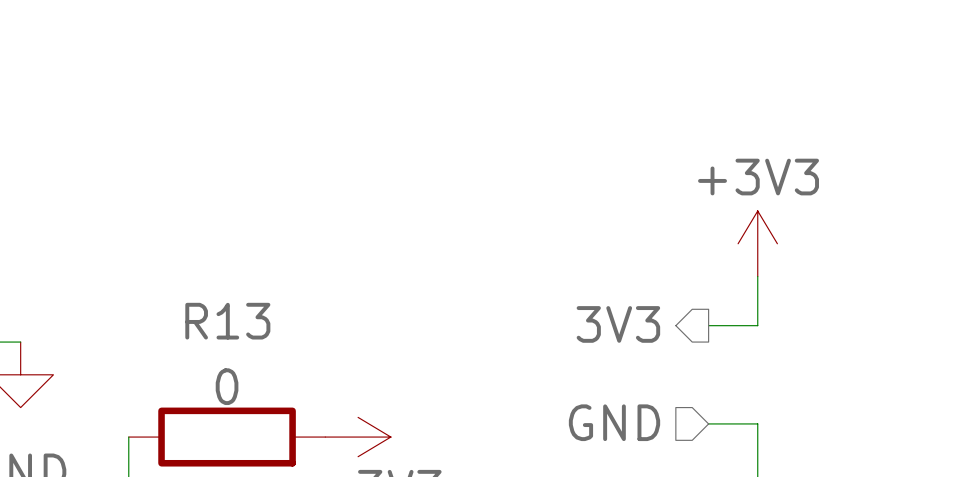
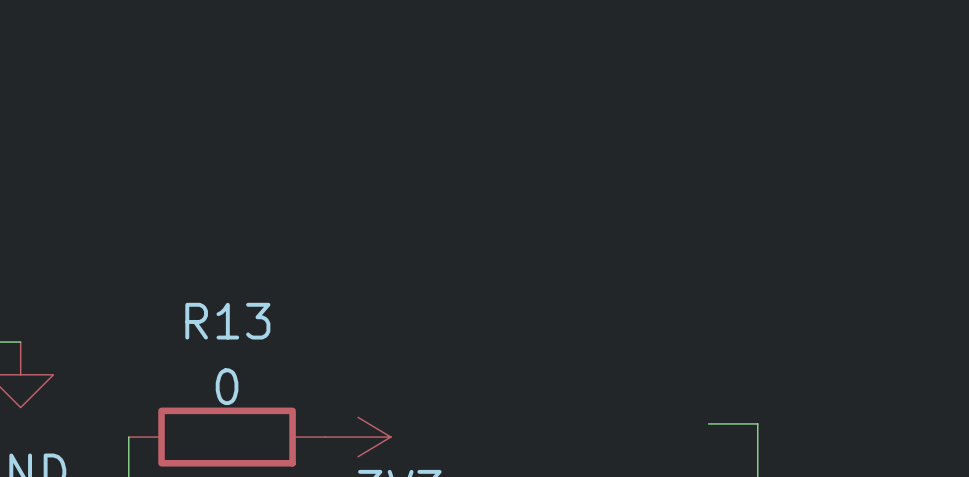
power symbol: +3V3 (757, 243) -> none
wire: (757, 276) (757, 325) (708, 325) -> none
hierarchical label: 3V3 (618, 324) -> none
hierarchical label: GND (614, 422) -> none

